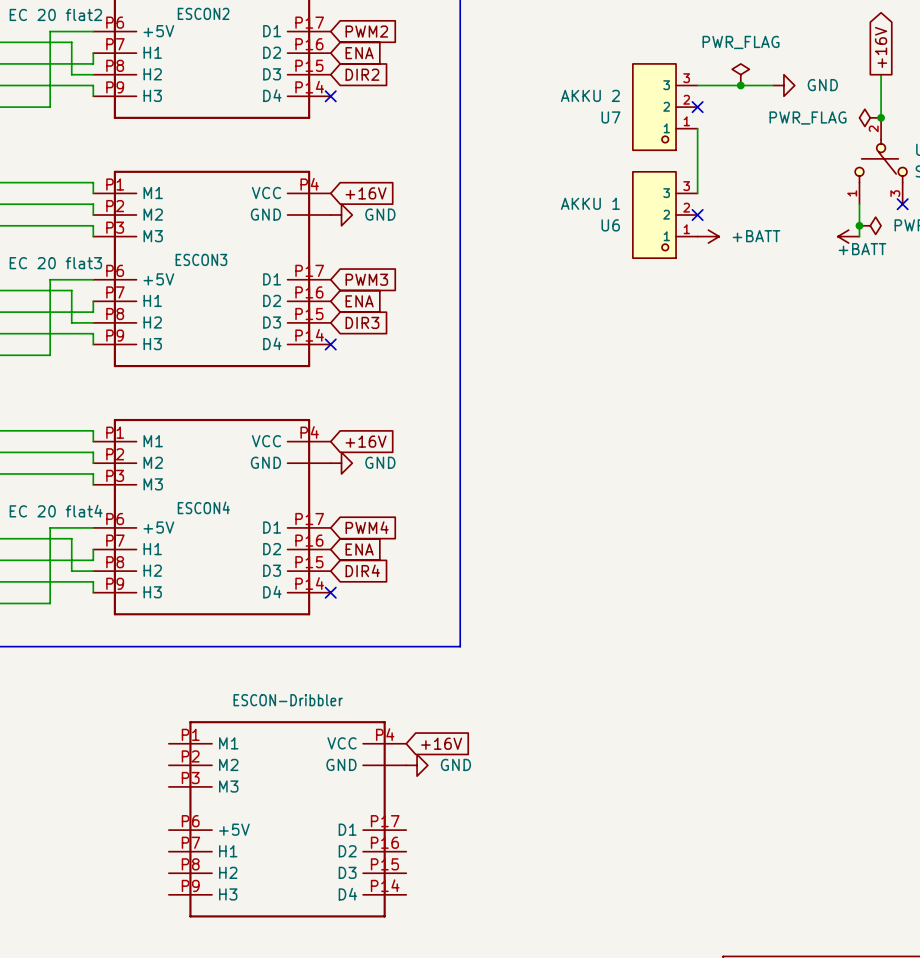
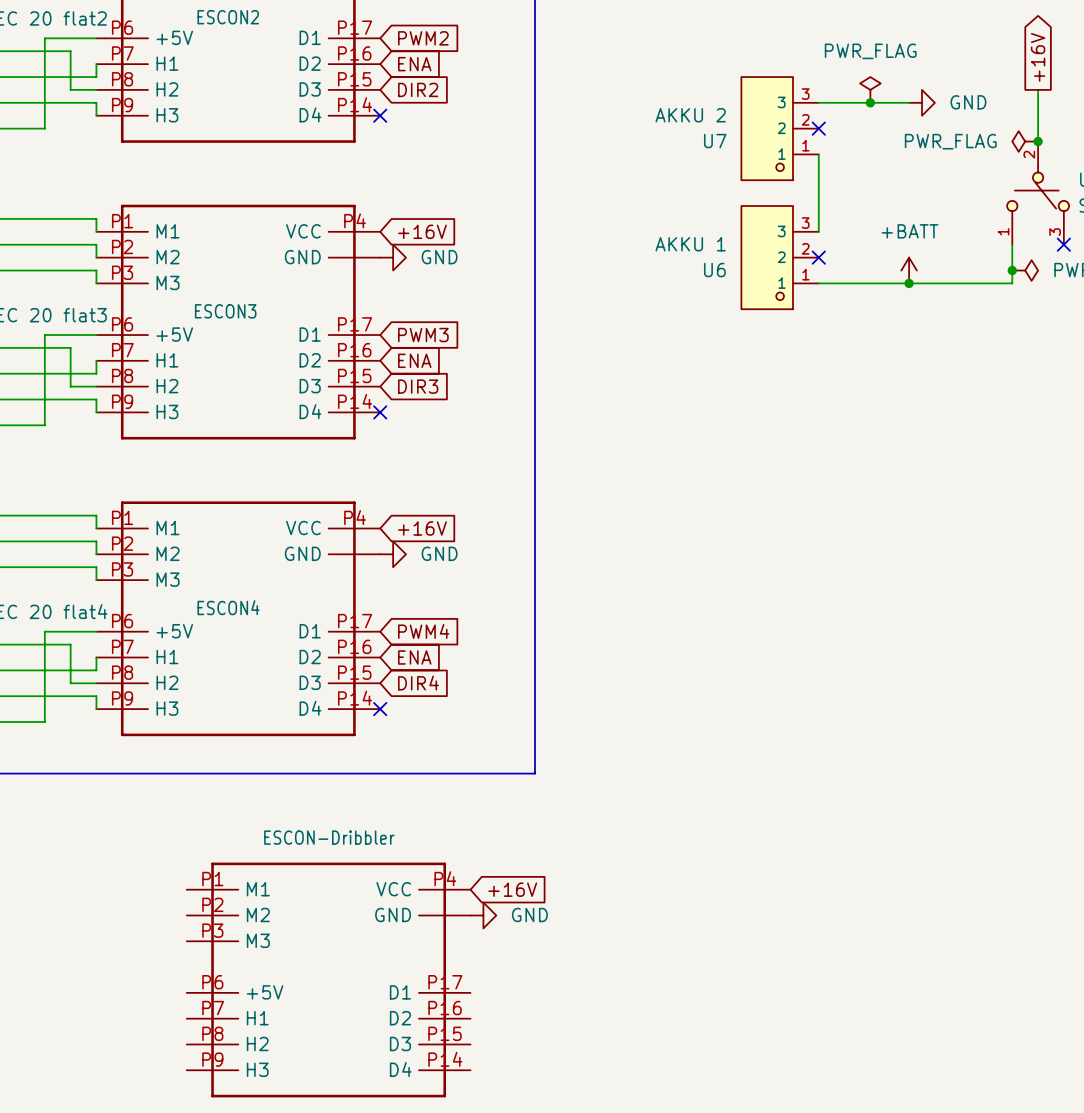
power symbol: none -> +BATT (909, 270)
wire: none -> (818, 283) (1012, 283)
power symbol: +BATT (708, 236) -> none
junction: none -> (909, 283)
power symbol: +BATT (848, 236) -> none

